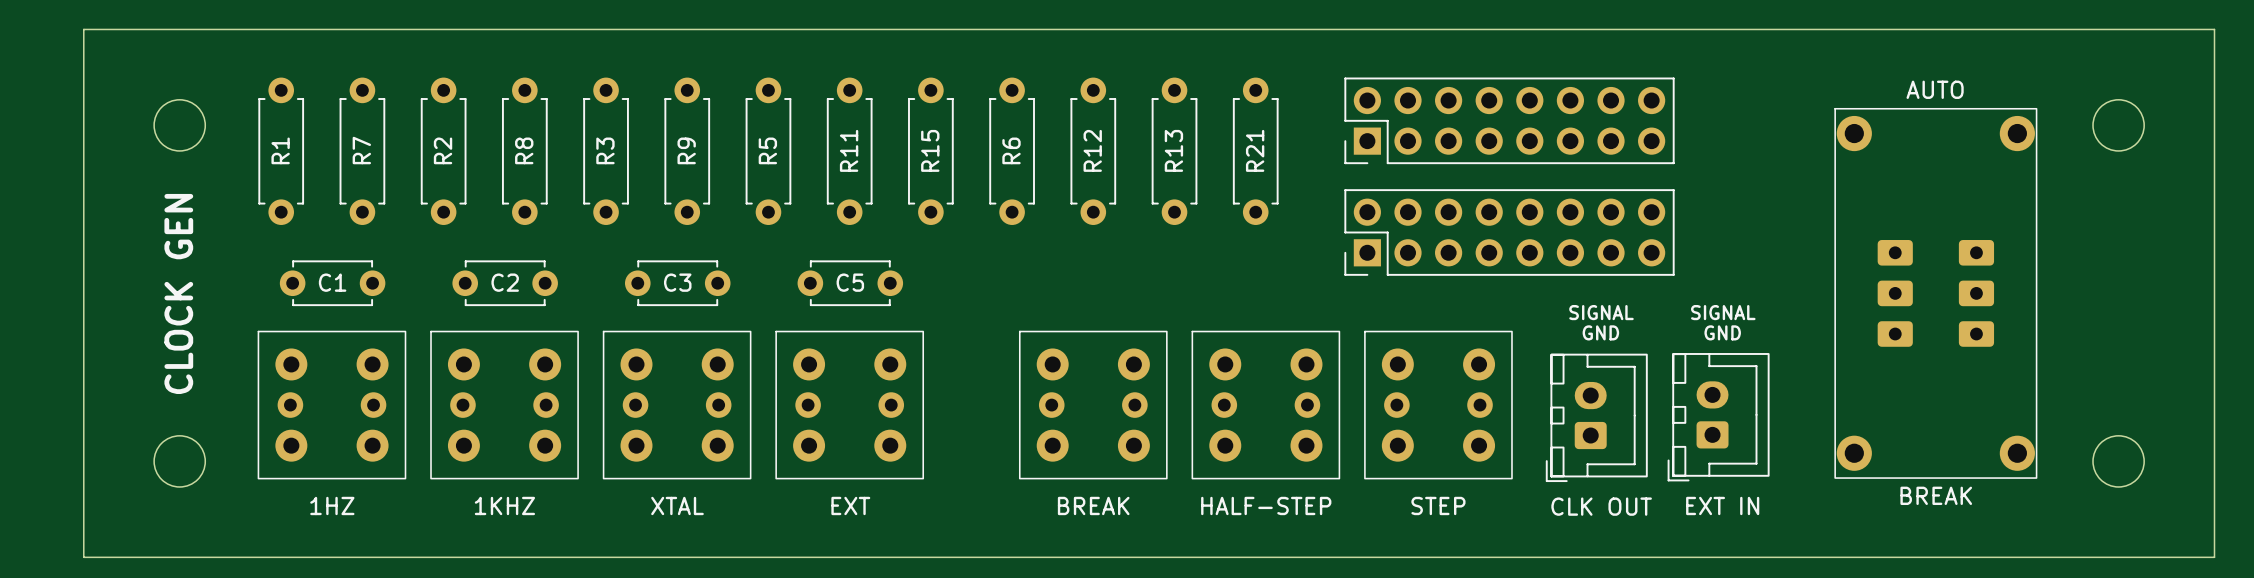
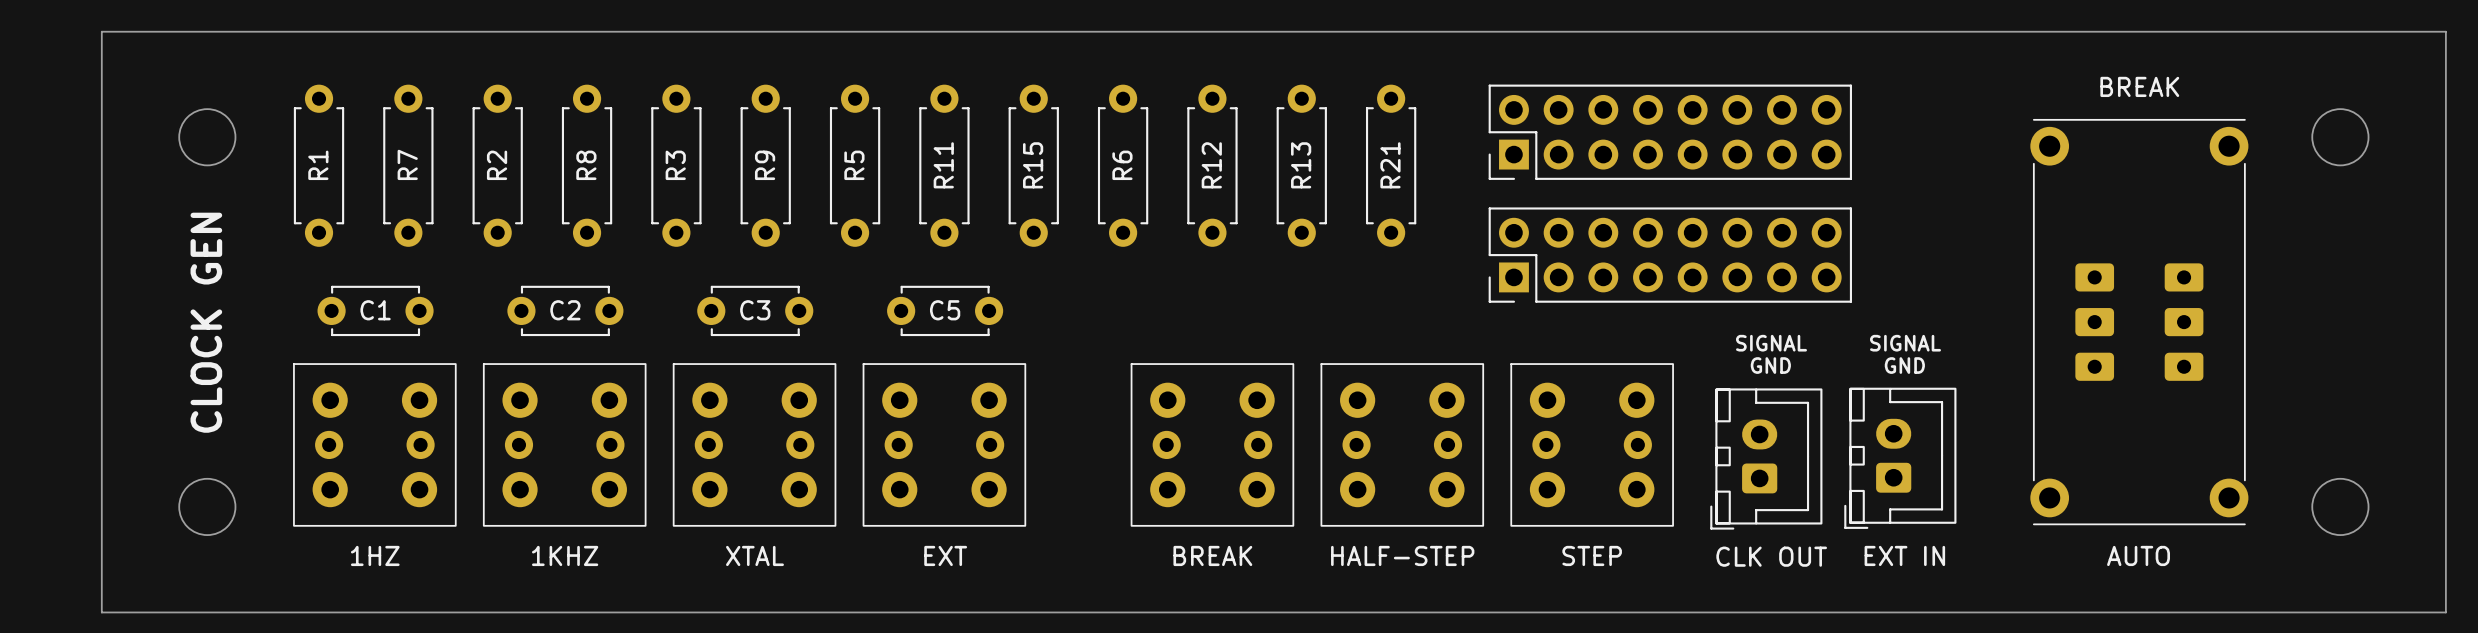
text: AUTO (1935, 89) -> BREAK (2139, 86)
part footprint: [1834, 107, 2038, 479] -> [2030, 118, 2249, 526]
text: BREAK (1936, 495) -> AUTO (2138, 555)

